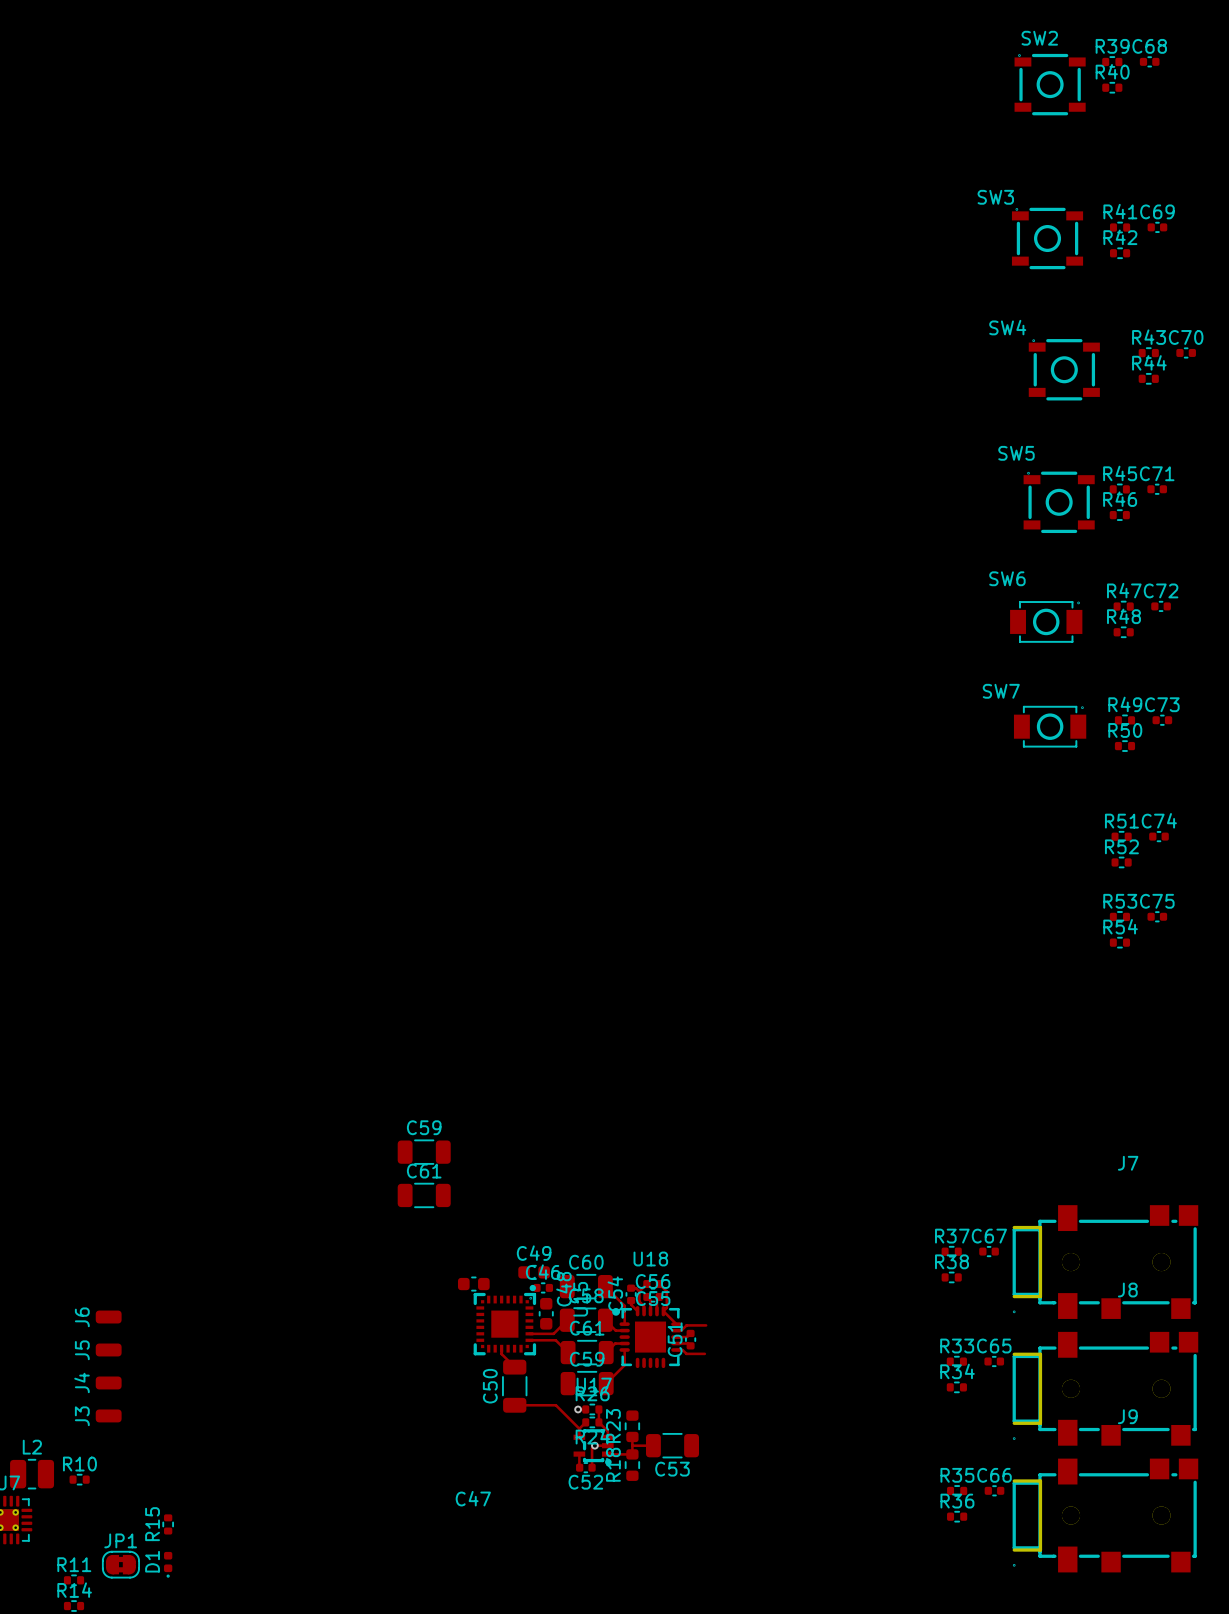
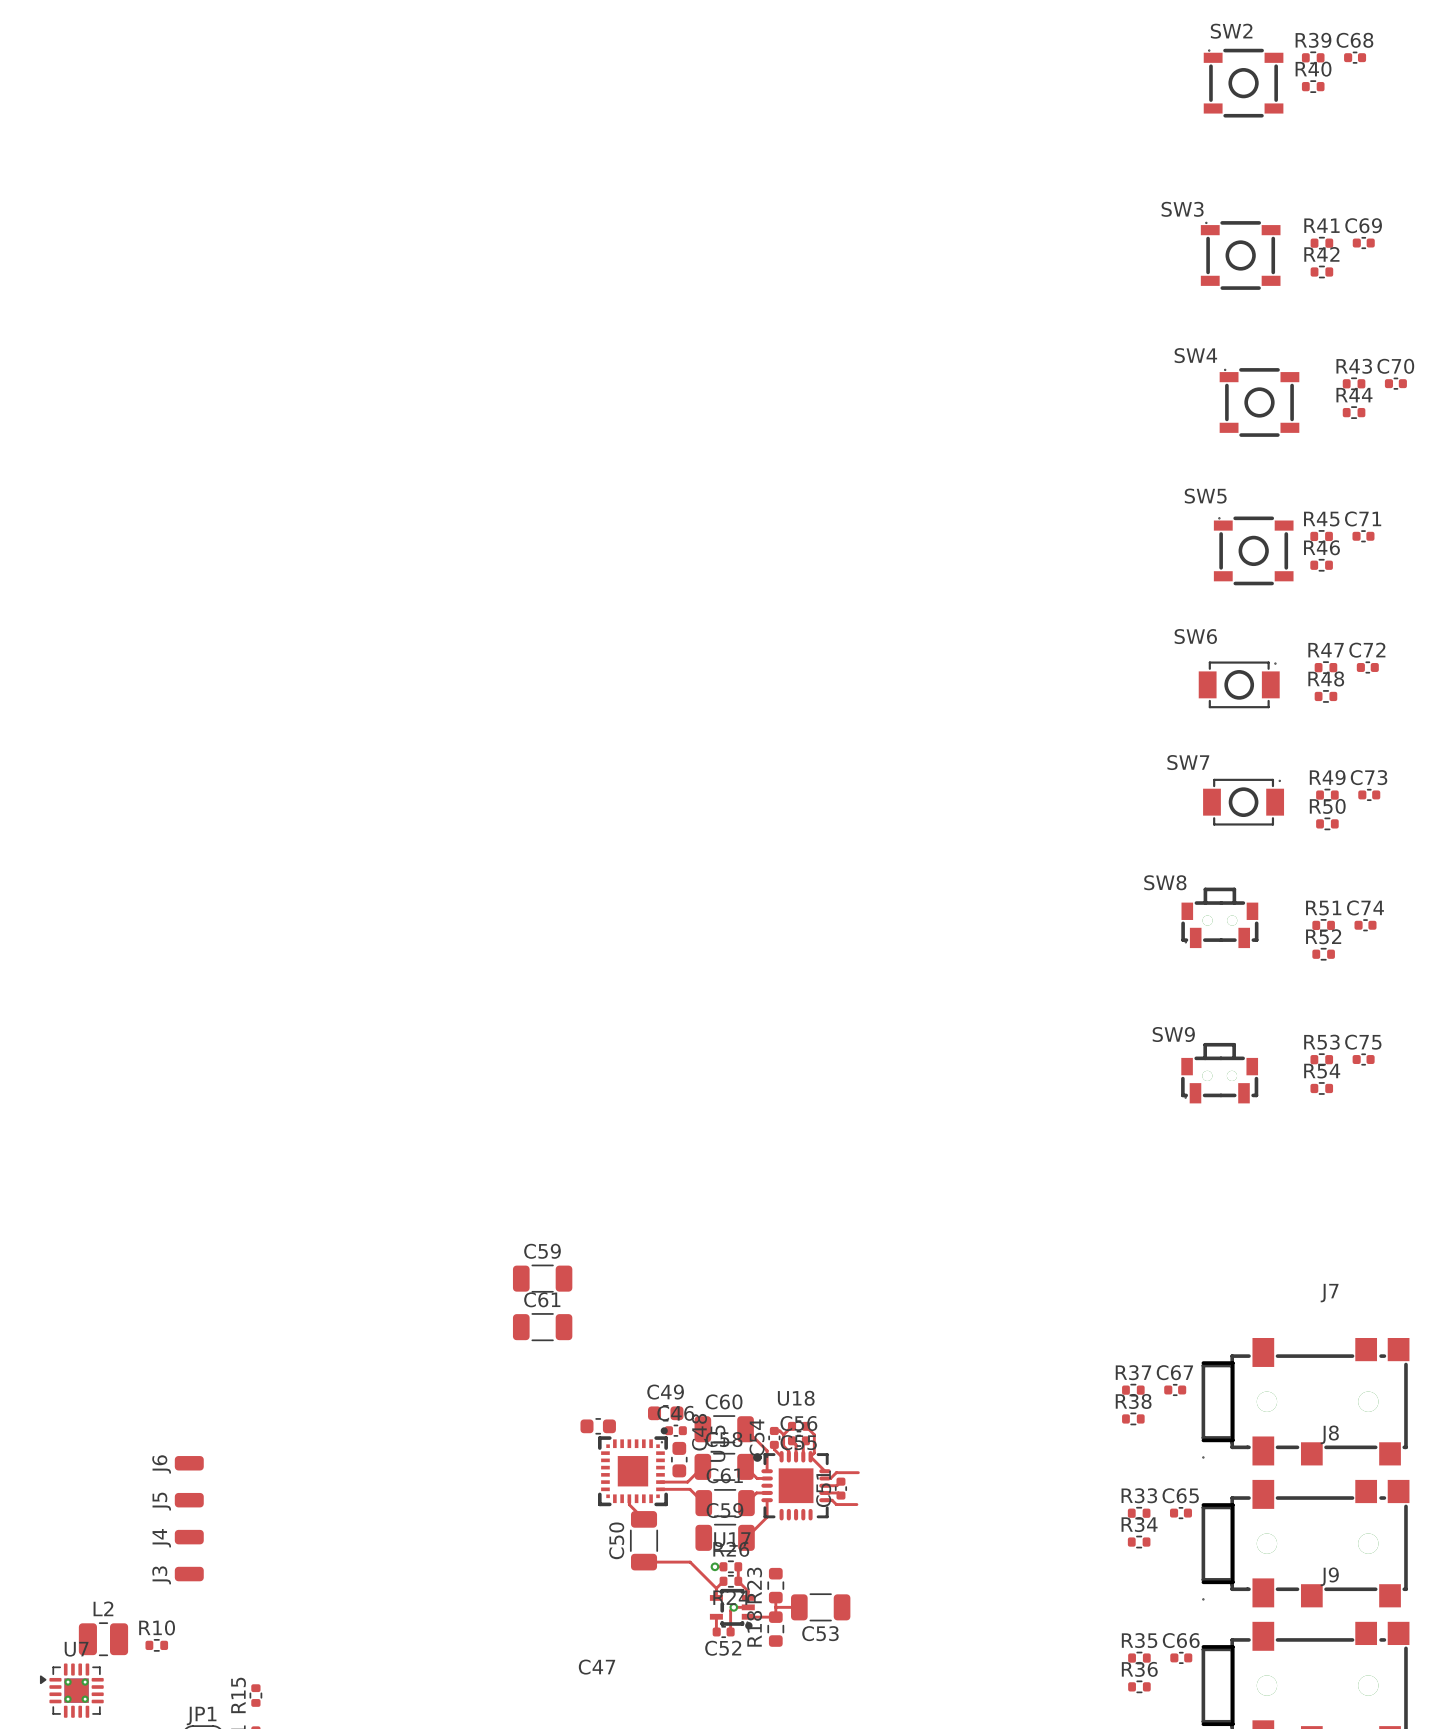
SW8: none -> (1219, 917)
R53 position: (1119, 916) -> (1321, 1059)
C75 position: (1157, 916) -> (1363, 1059)
R54 position: (1119, 942) -> (1321, 1088)
SW9: none -> (1219, 1073)

